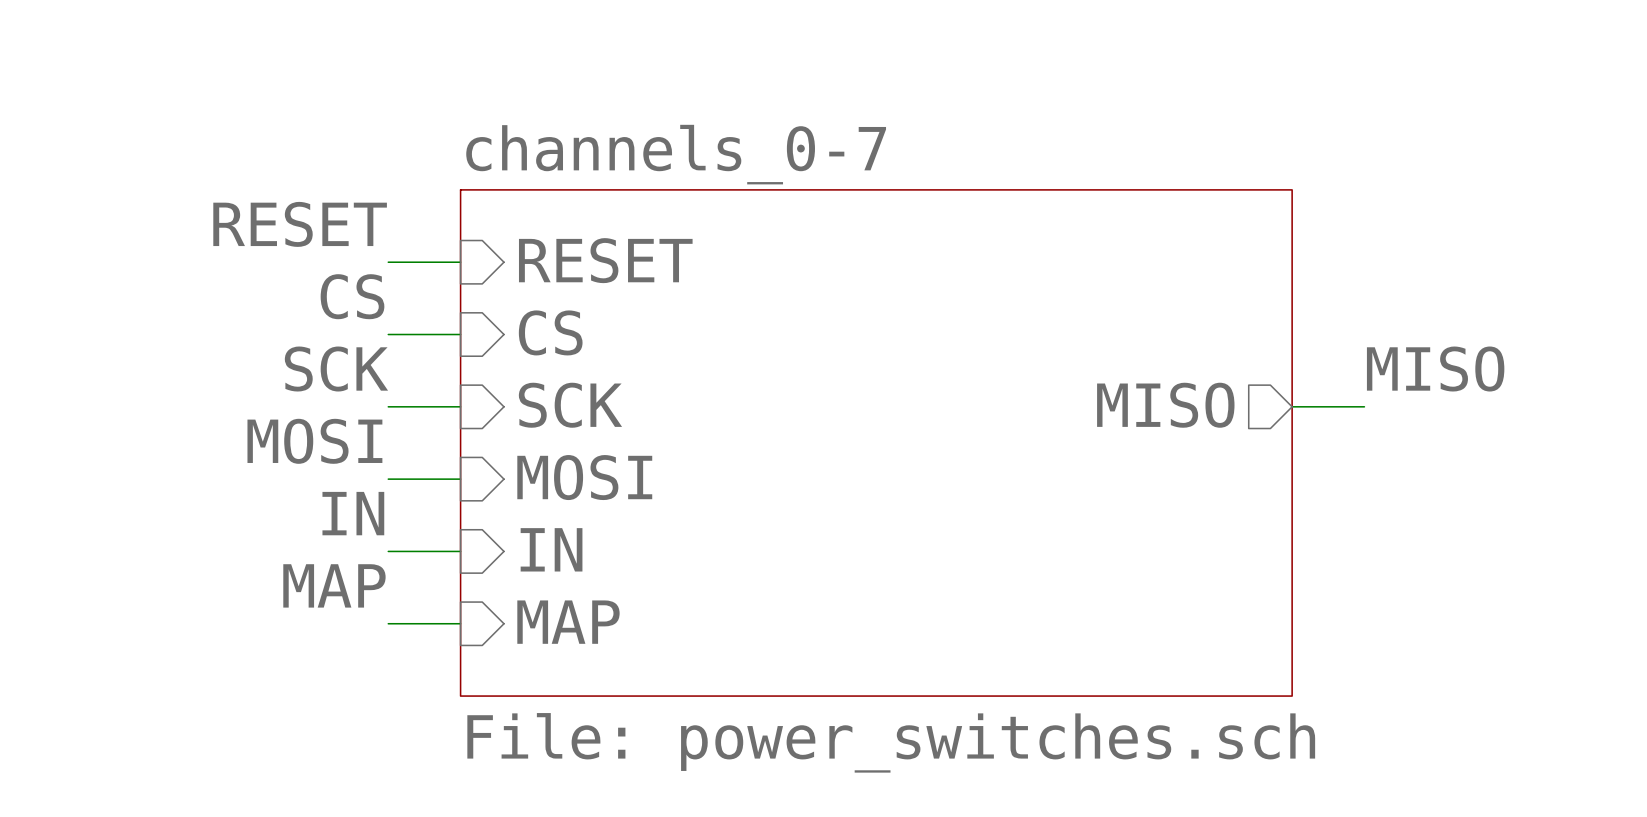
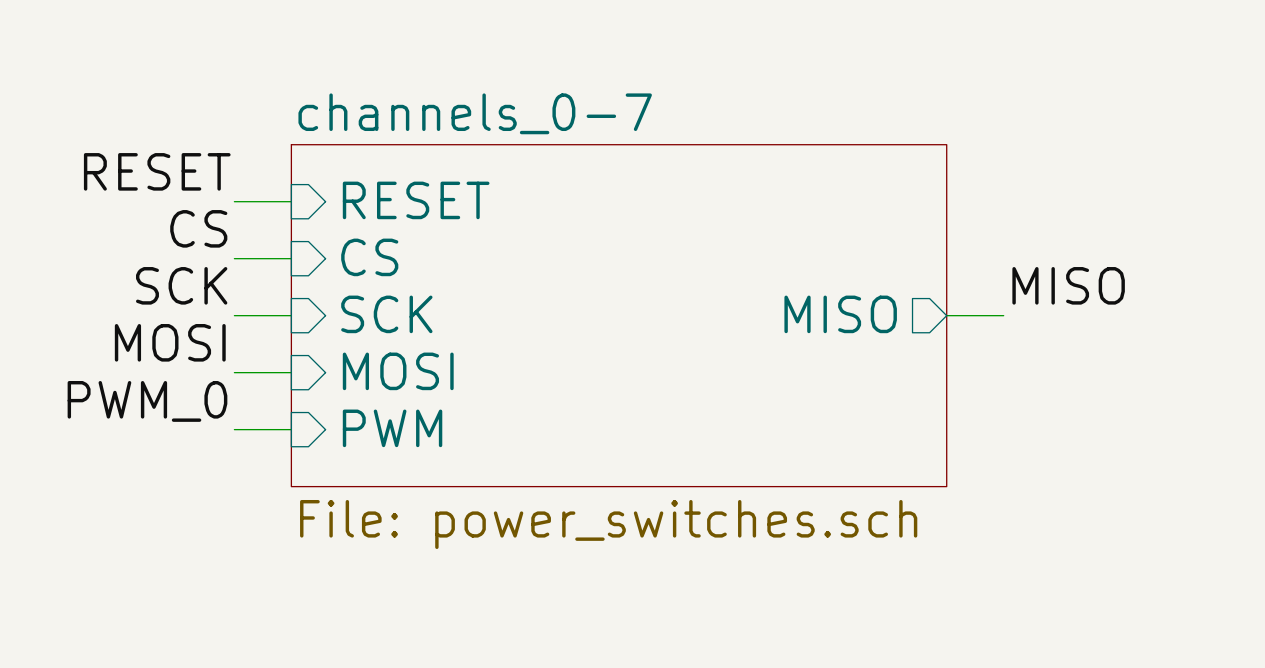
sheet channels_0-7 shape: [460, 189, 1293, 697] -> [291, 144, 947, 487]
label: IN (353, 513) -> PWM_0 (147, 401)
sheet pin: IN (551, 549) -> PWM (392, 428)
label: MAP (334, 585) -> none
sheet pin: MAP (568, 622) -> none
wire: (388, 623) (460, 623) -> none

